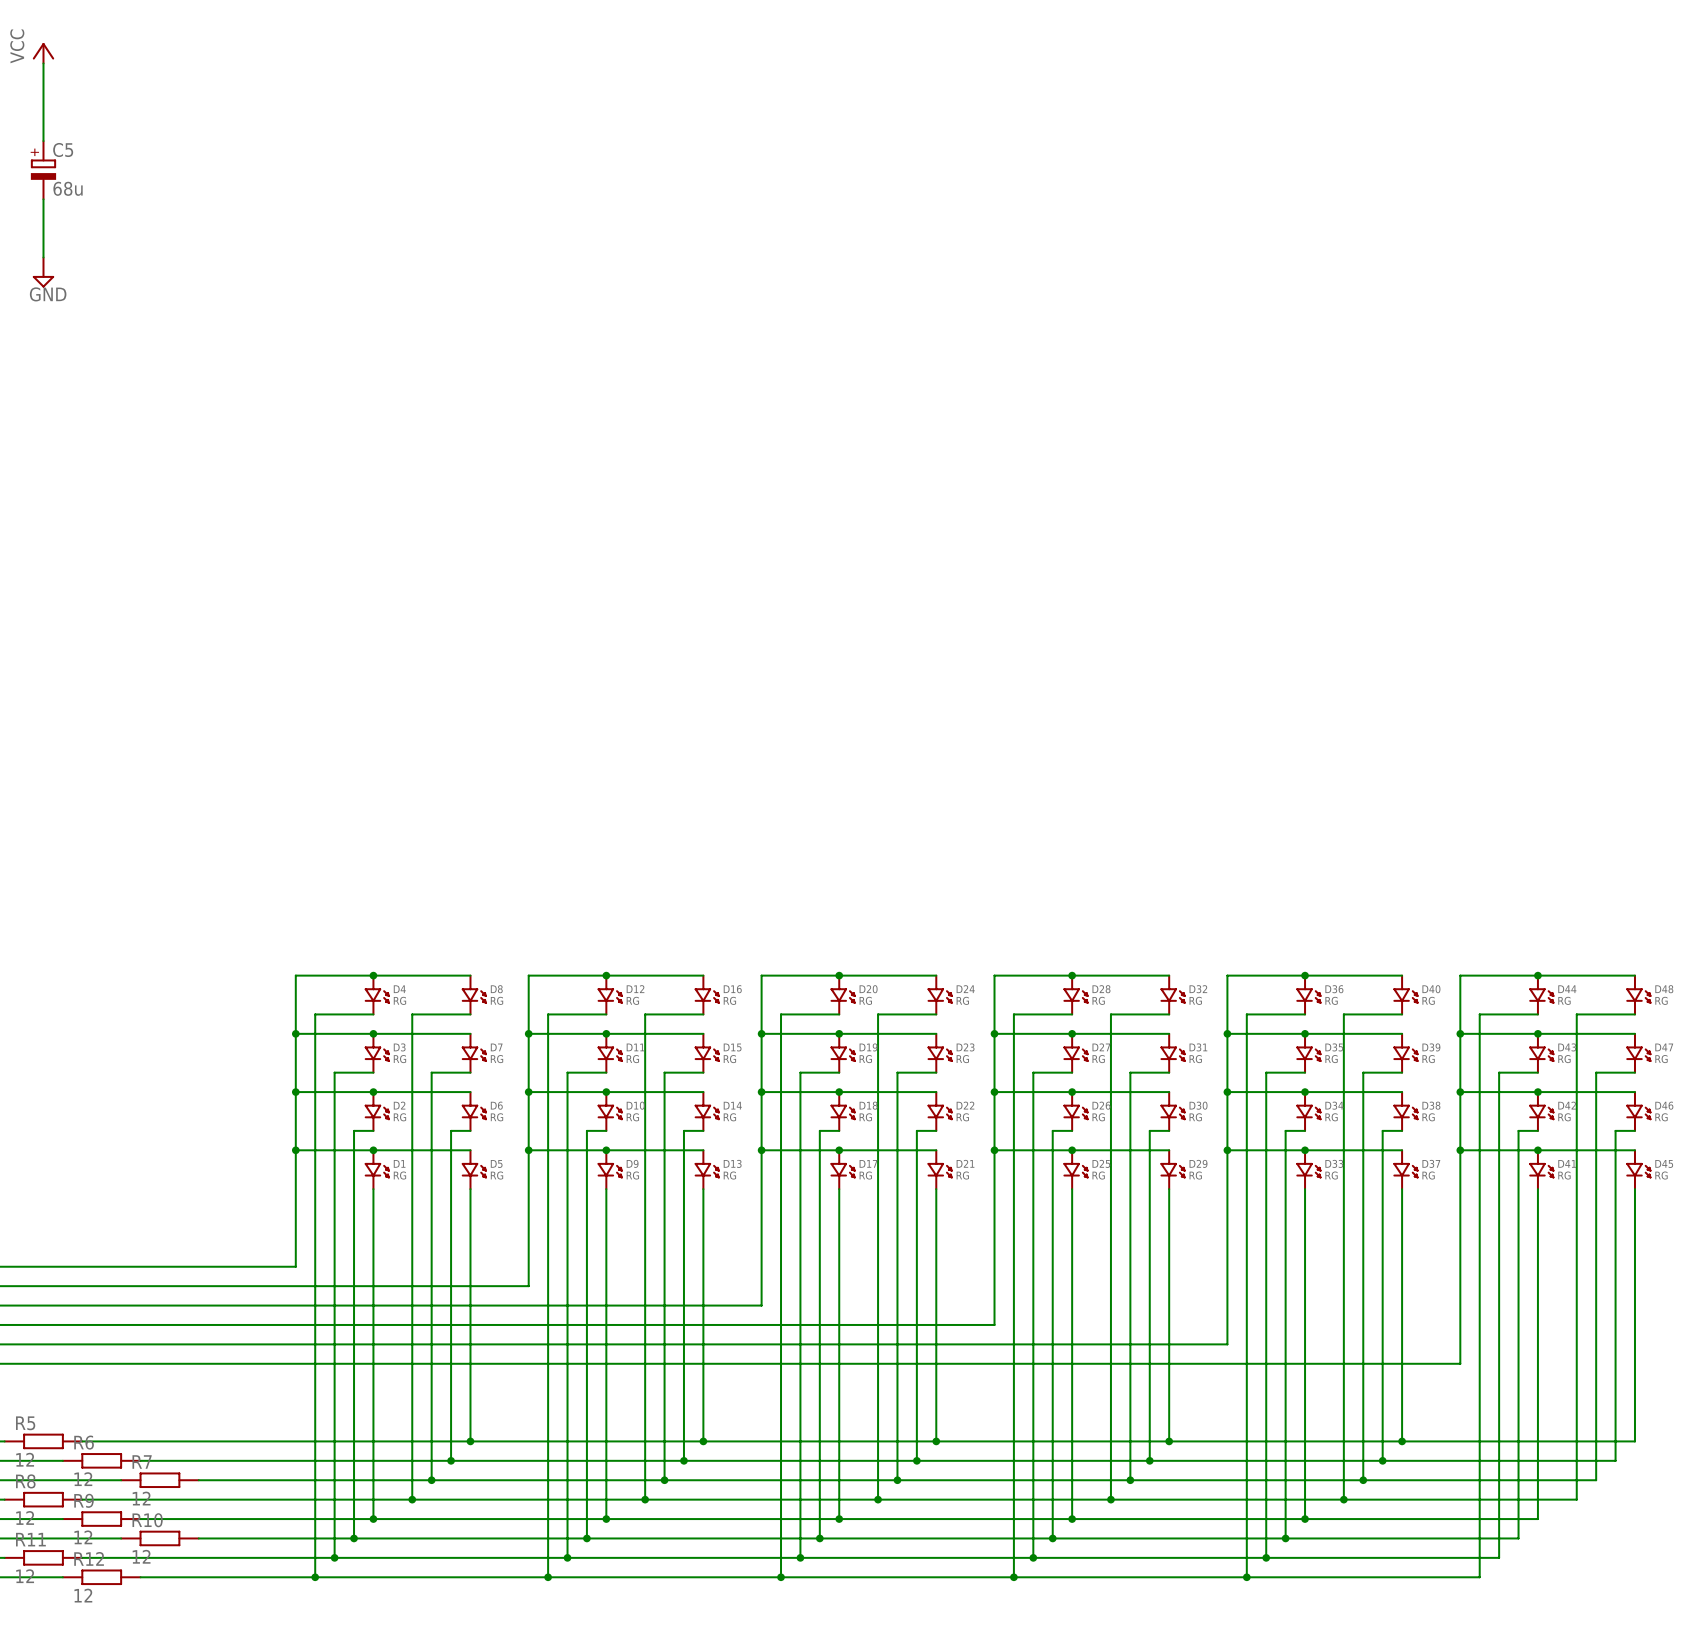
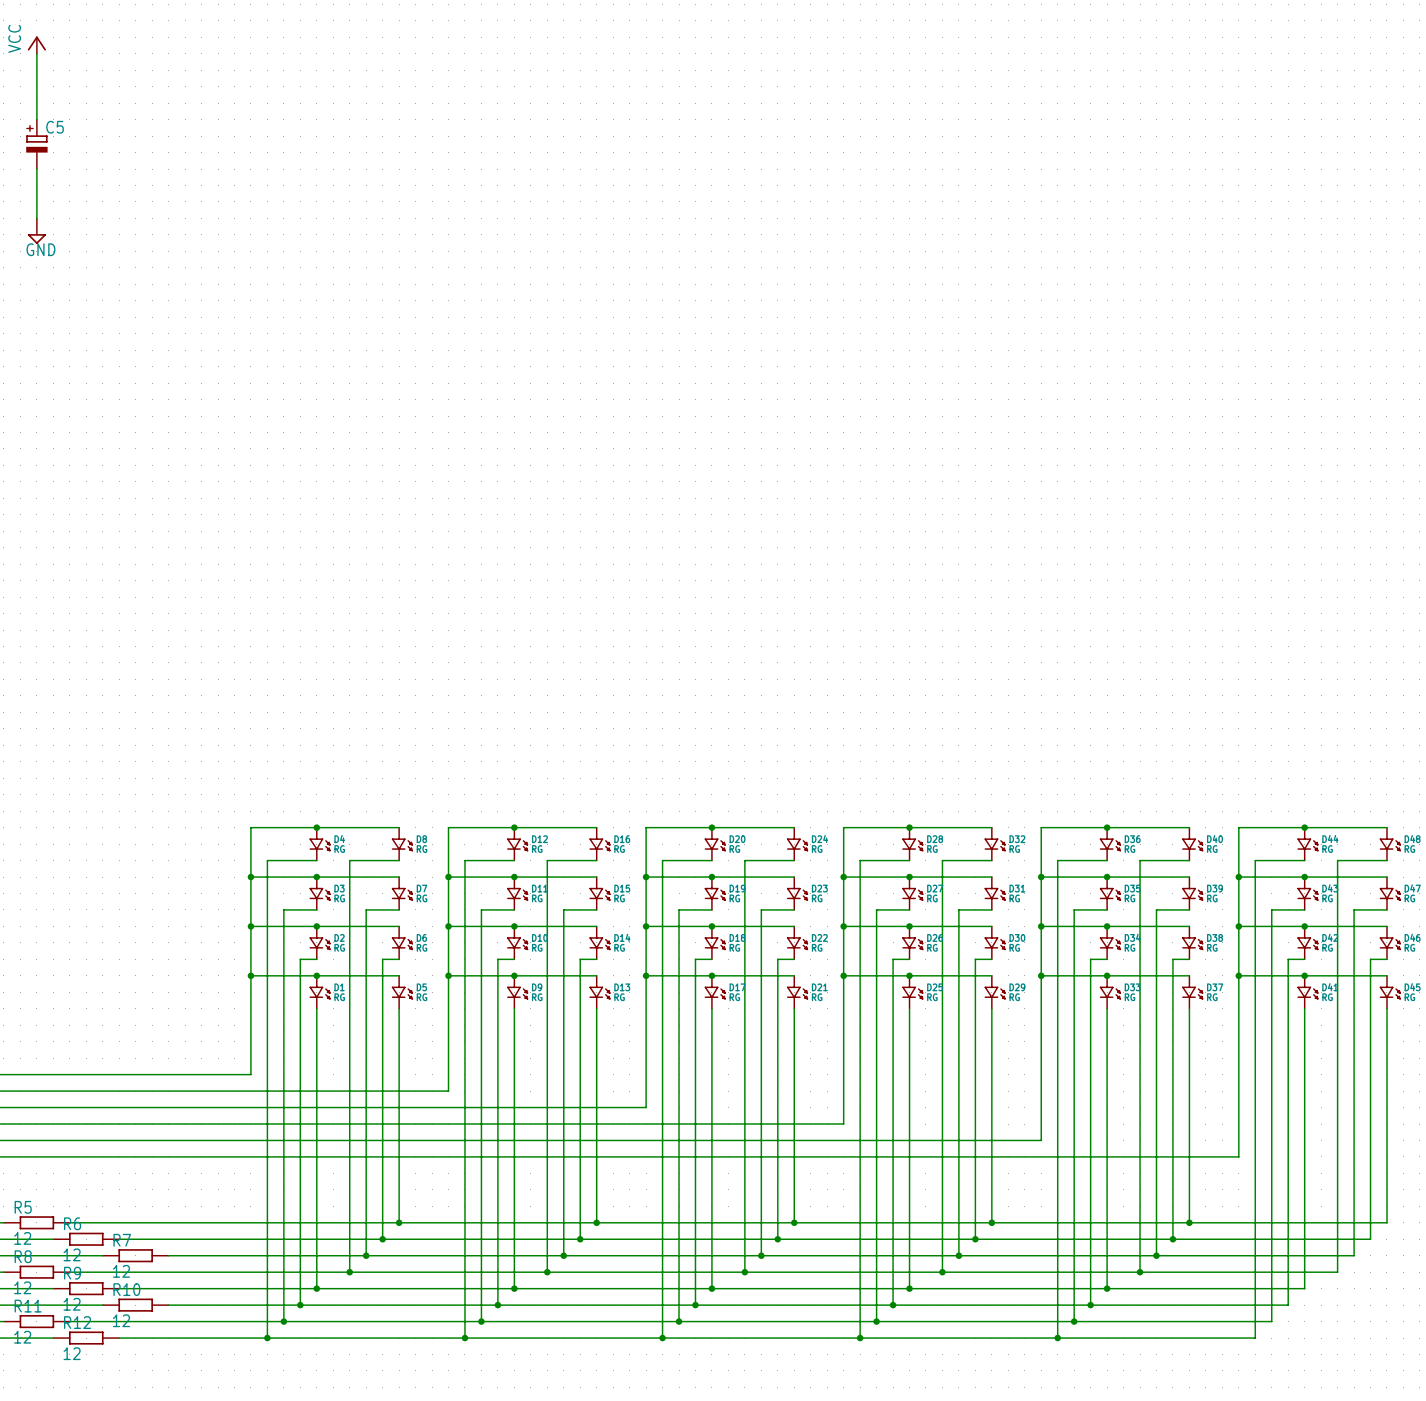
C5 value: 68u (68, 188) -> none

